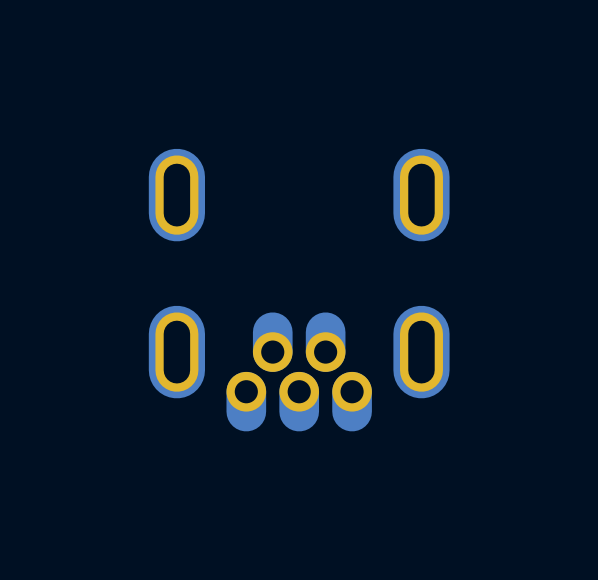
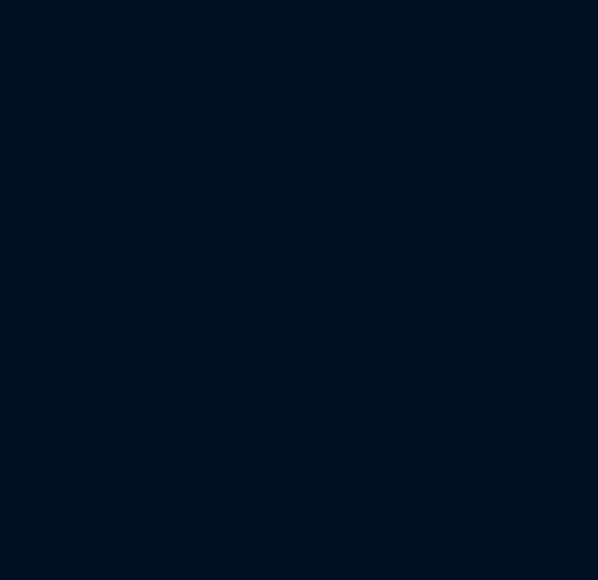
part: (299, 290) -> none

